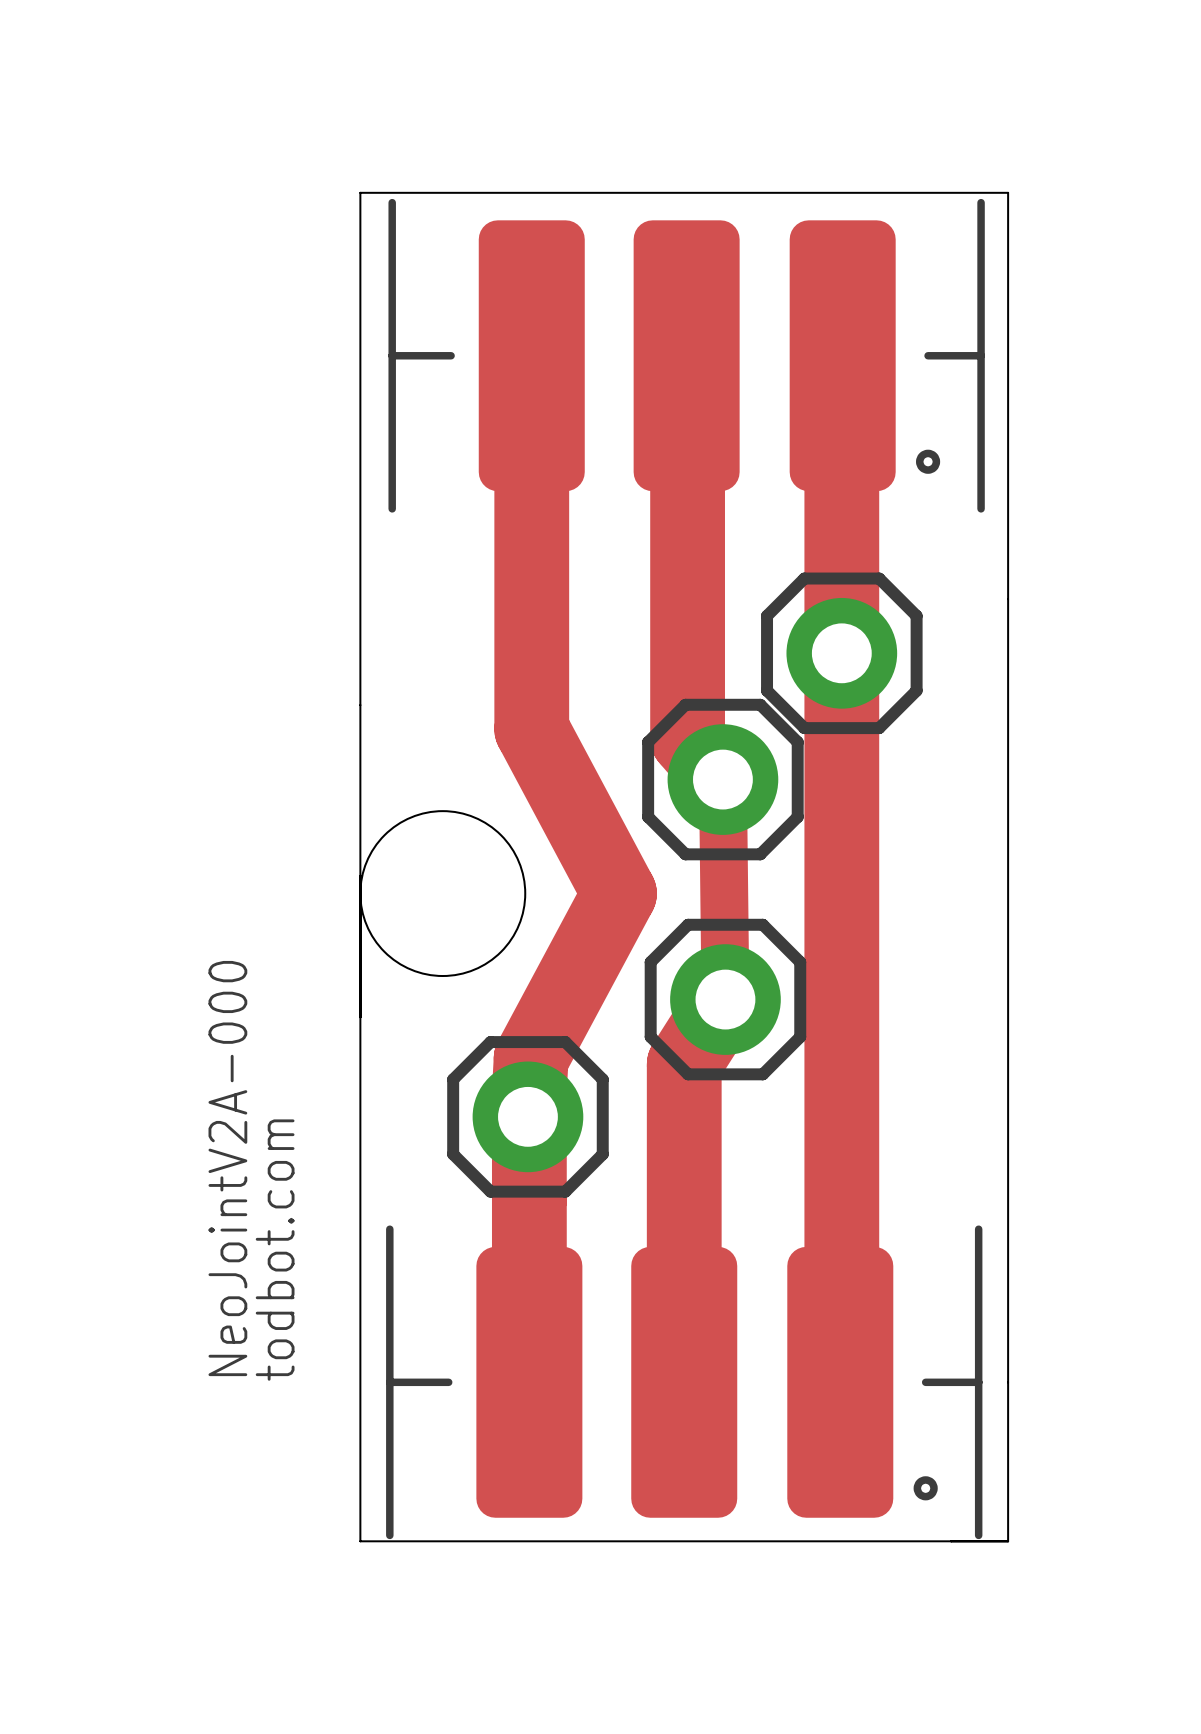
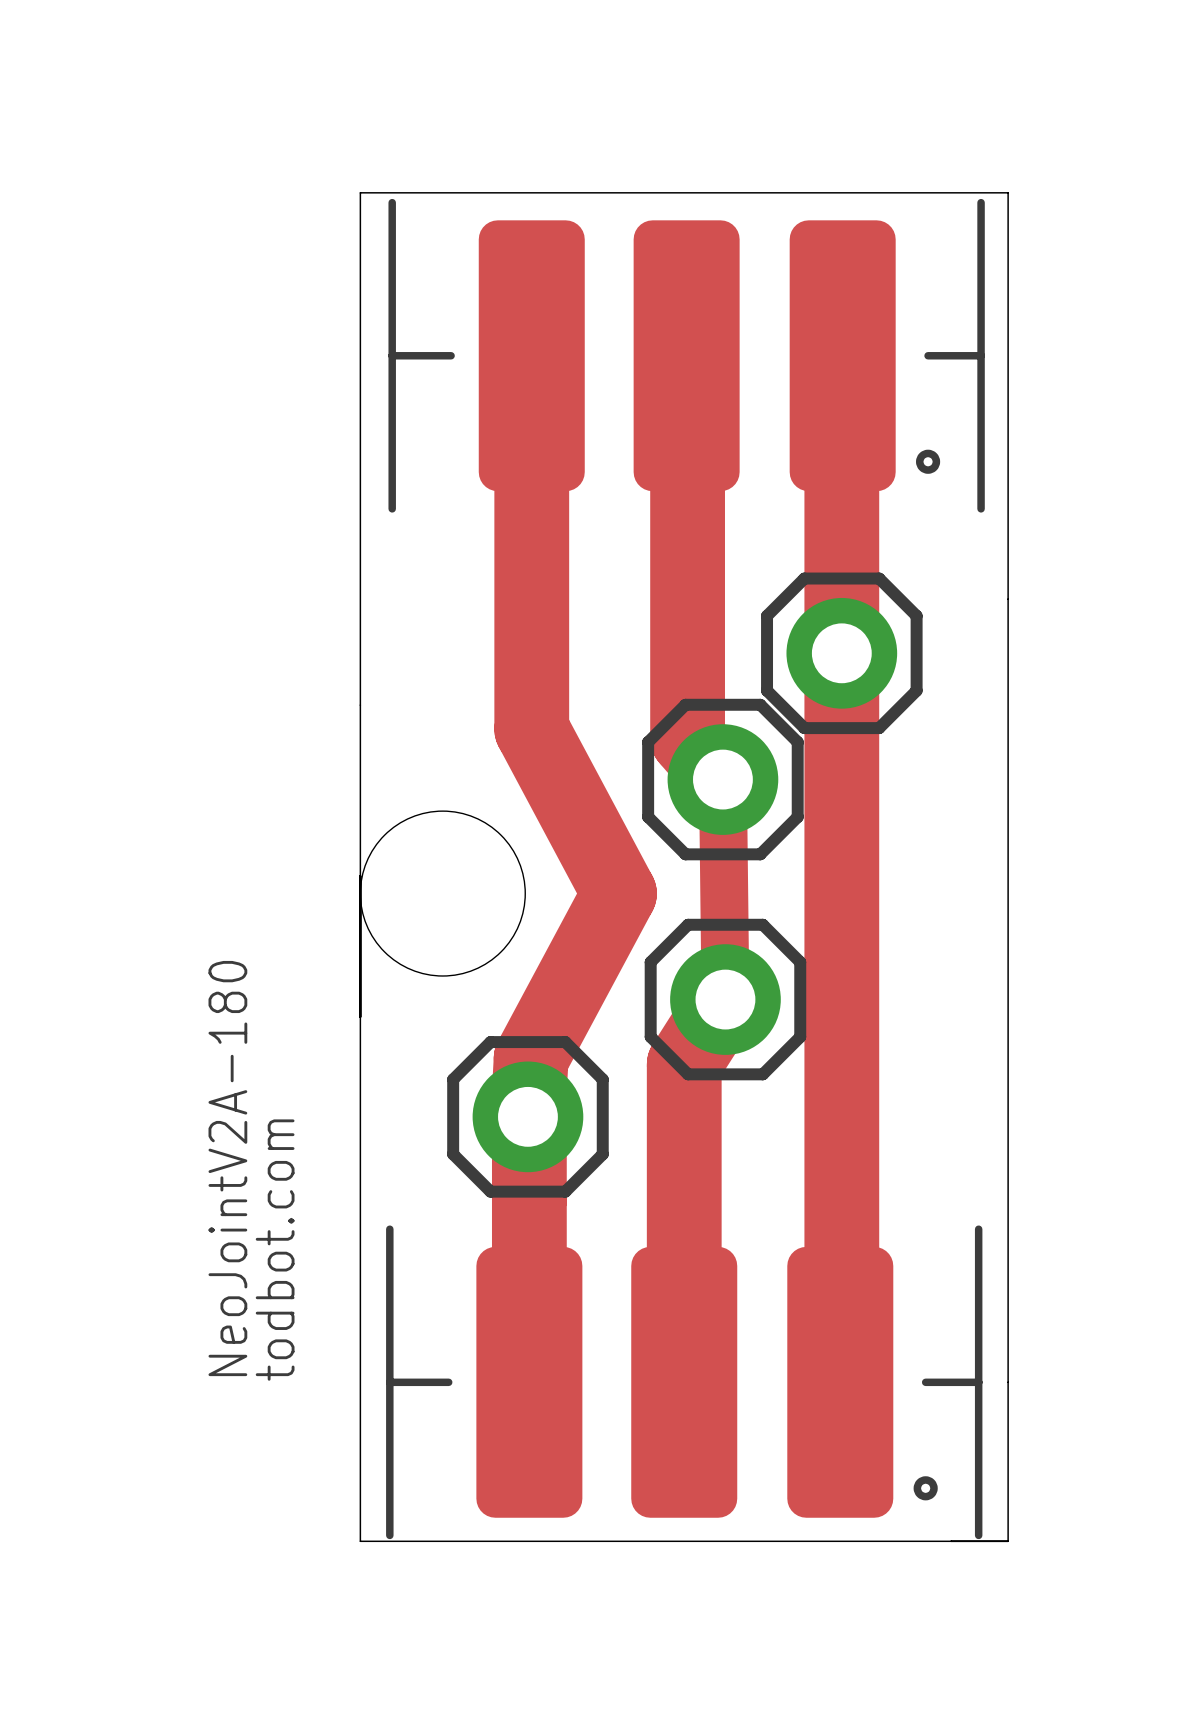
text: NeoJointV2A-000 (227, 1168) -> NeoJointV2A-180 (227, 1168)

